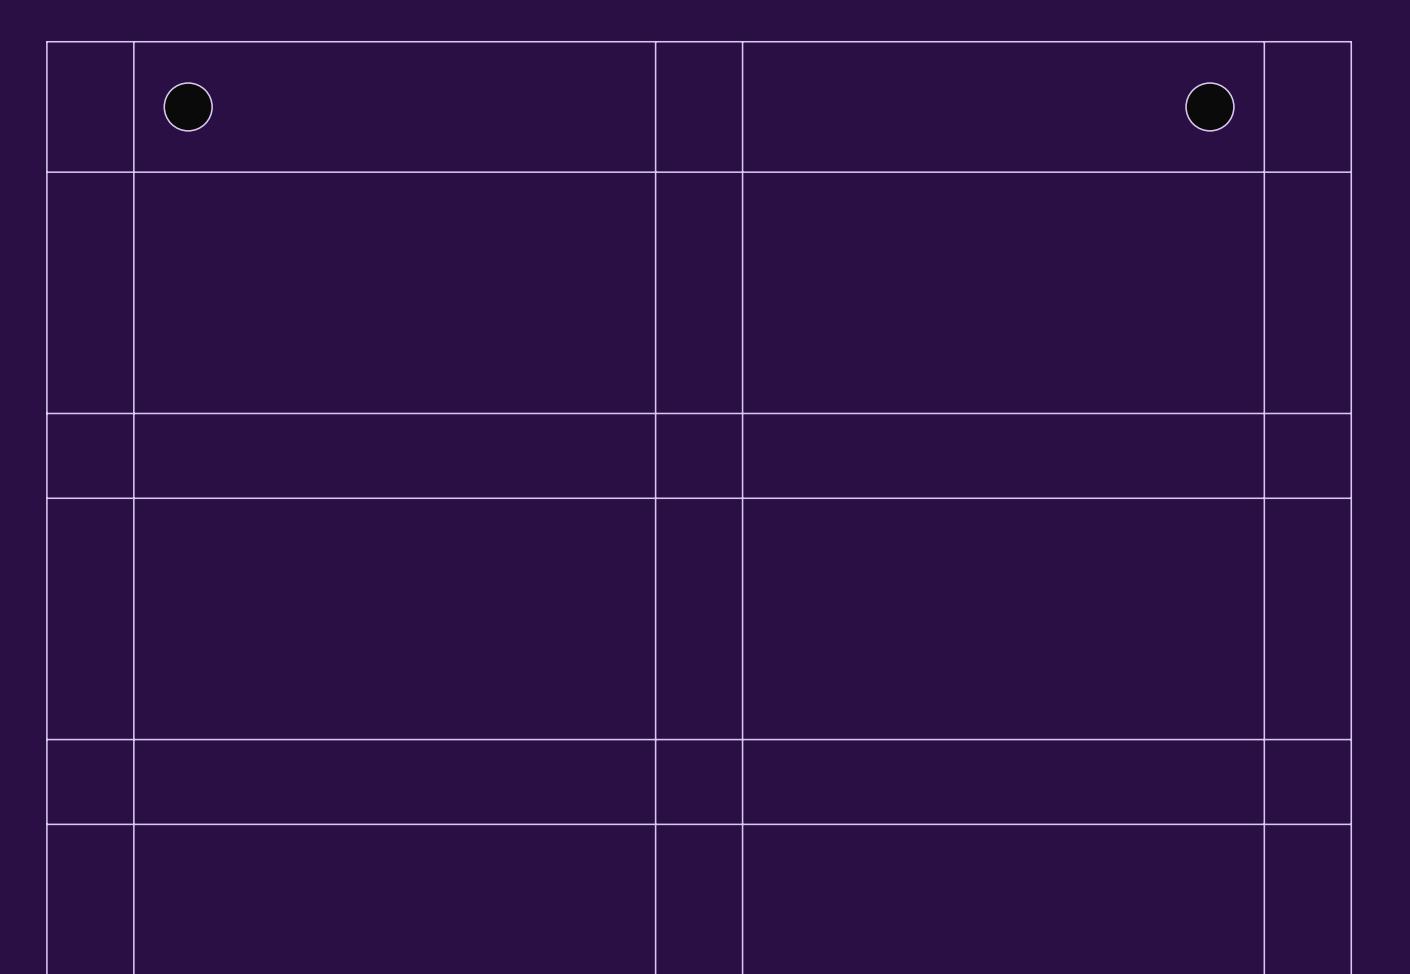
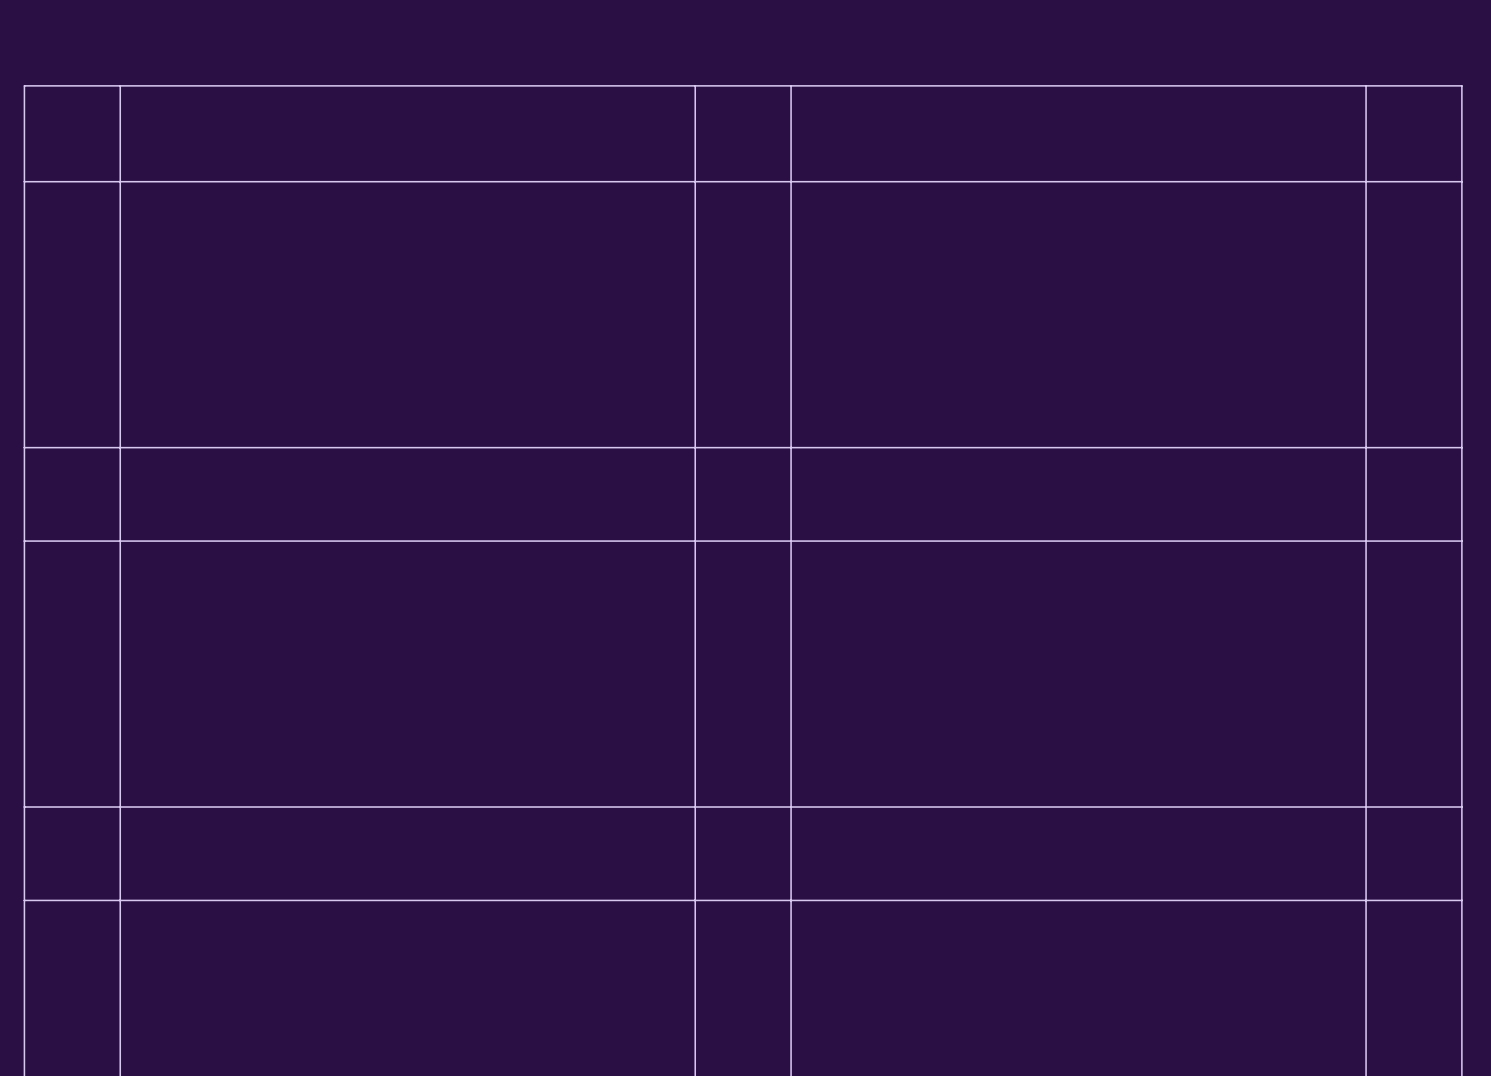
board edge: (133, 41) (133, 85) -> none
board edge: (655, 41) (655, 85) -> none
board edge: (742, 41) (742, 85) -> none
board edge: (1264, 41) (1264, 85) -> none
board edge: (1351, 85) (1351, 41) (46, 41) (46, 85) -> (1461, 85) (24, 85)
hole: (188, 106) -> none
hole: (1209, 106) -> none

